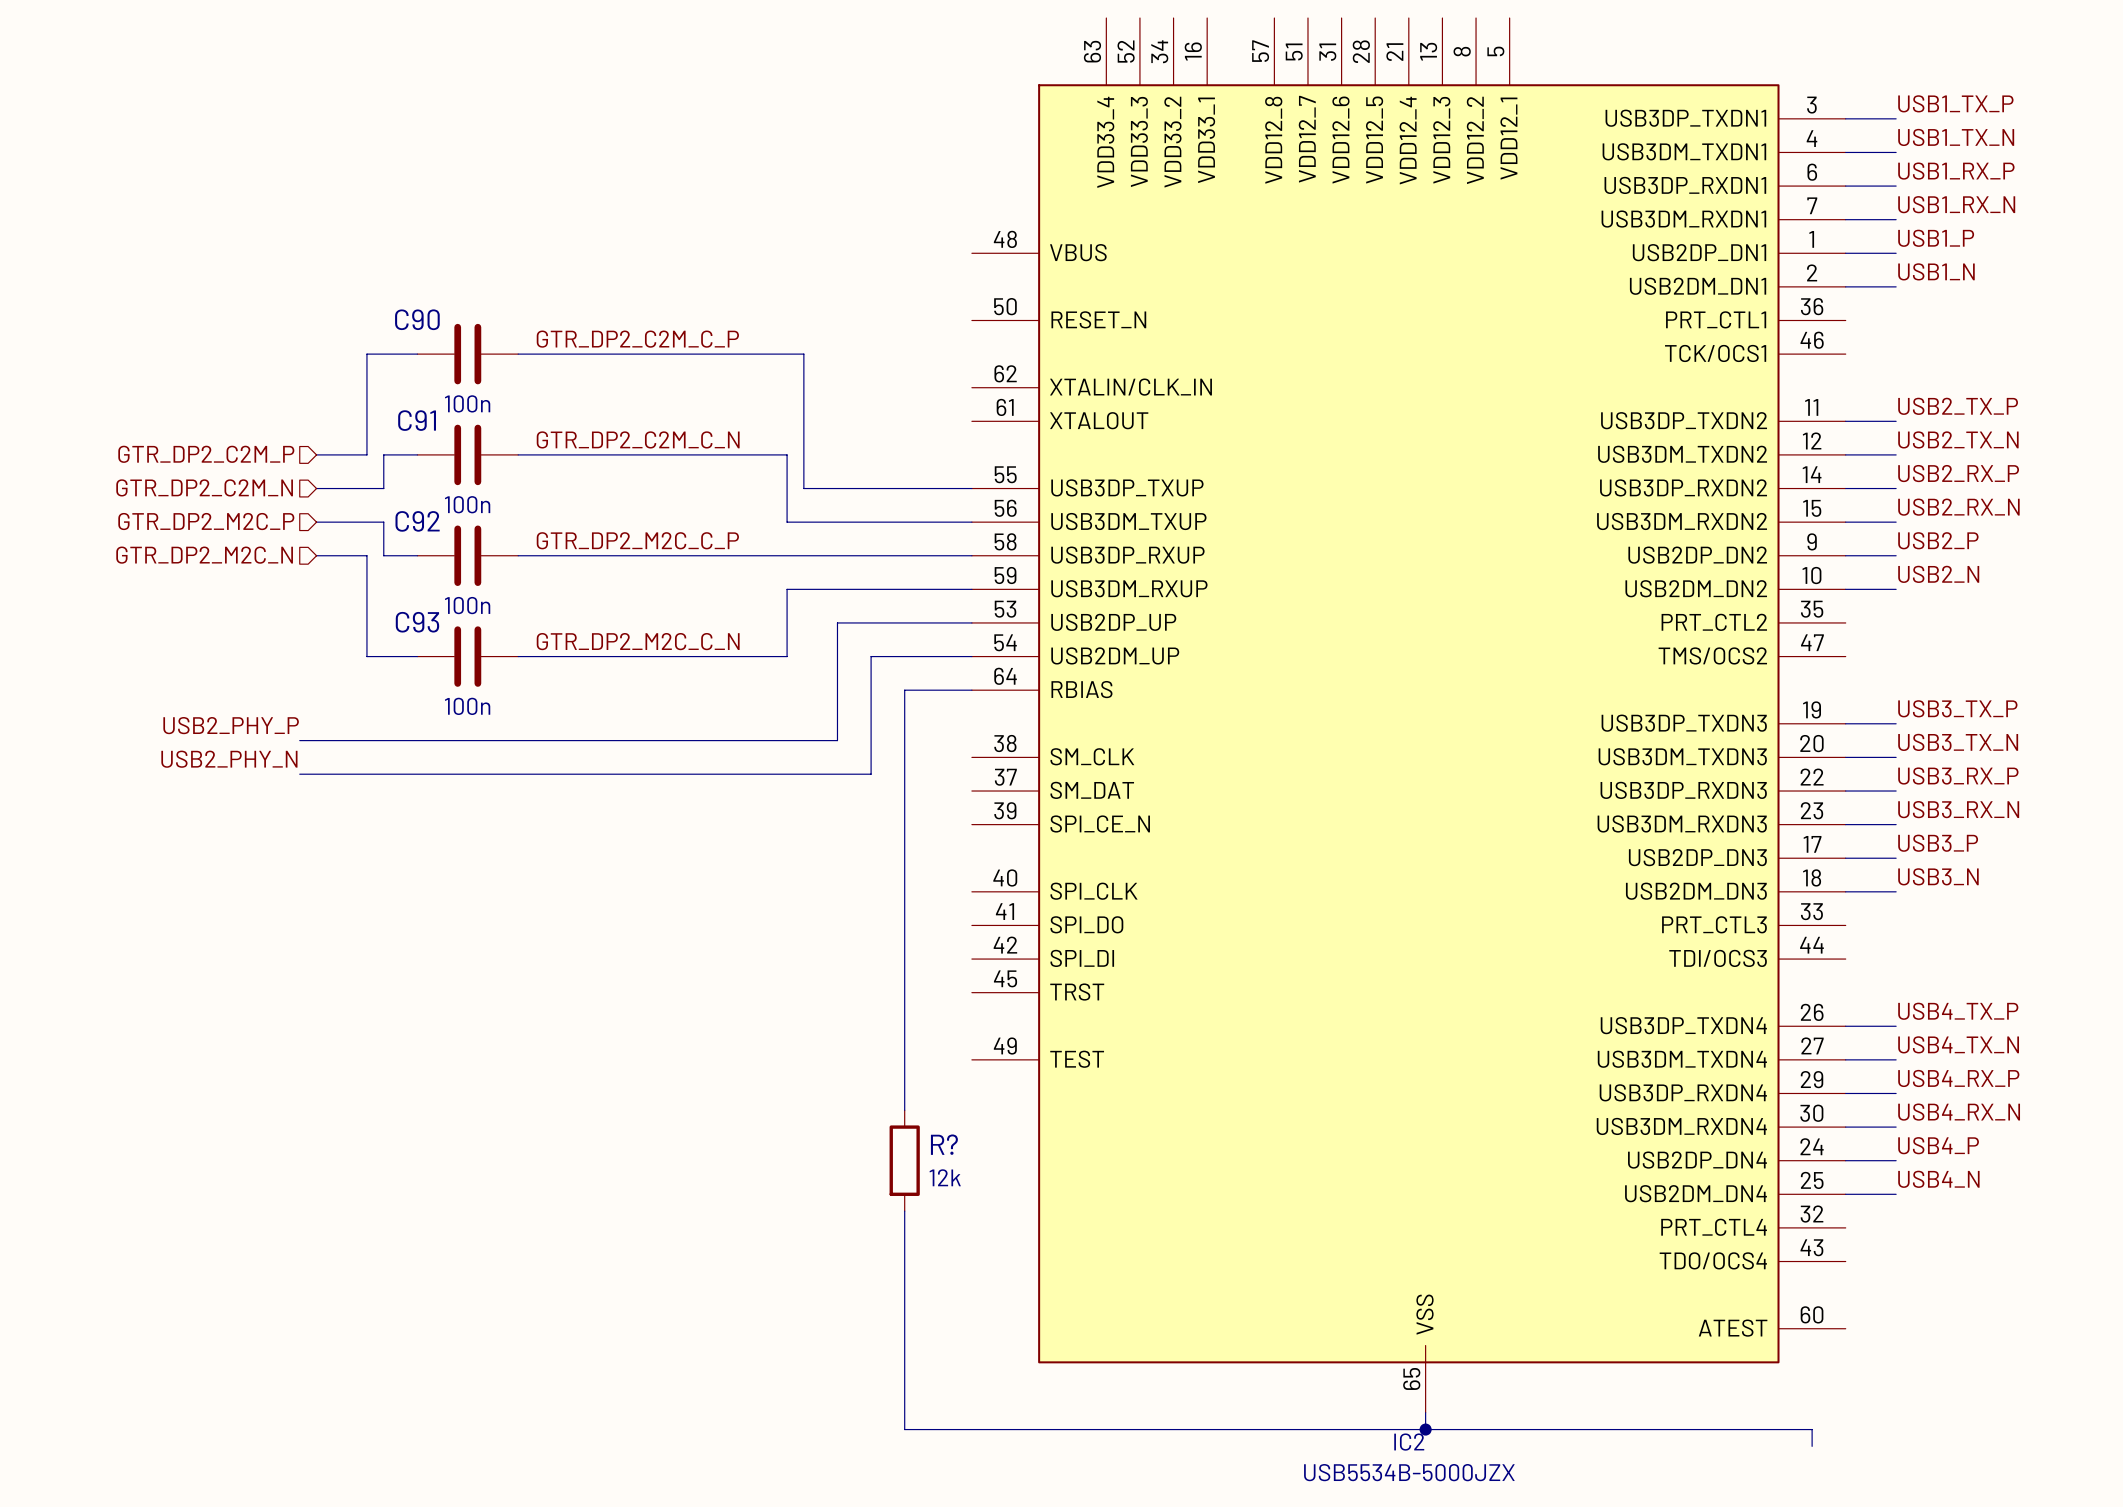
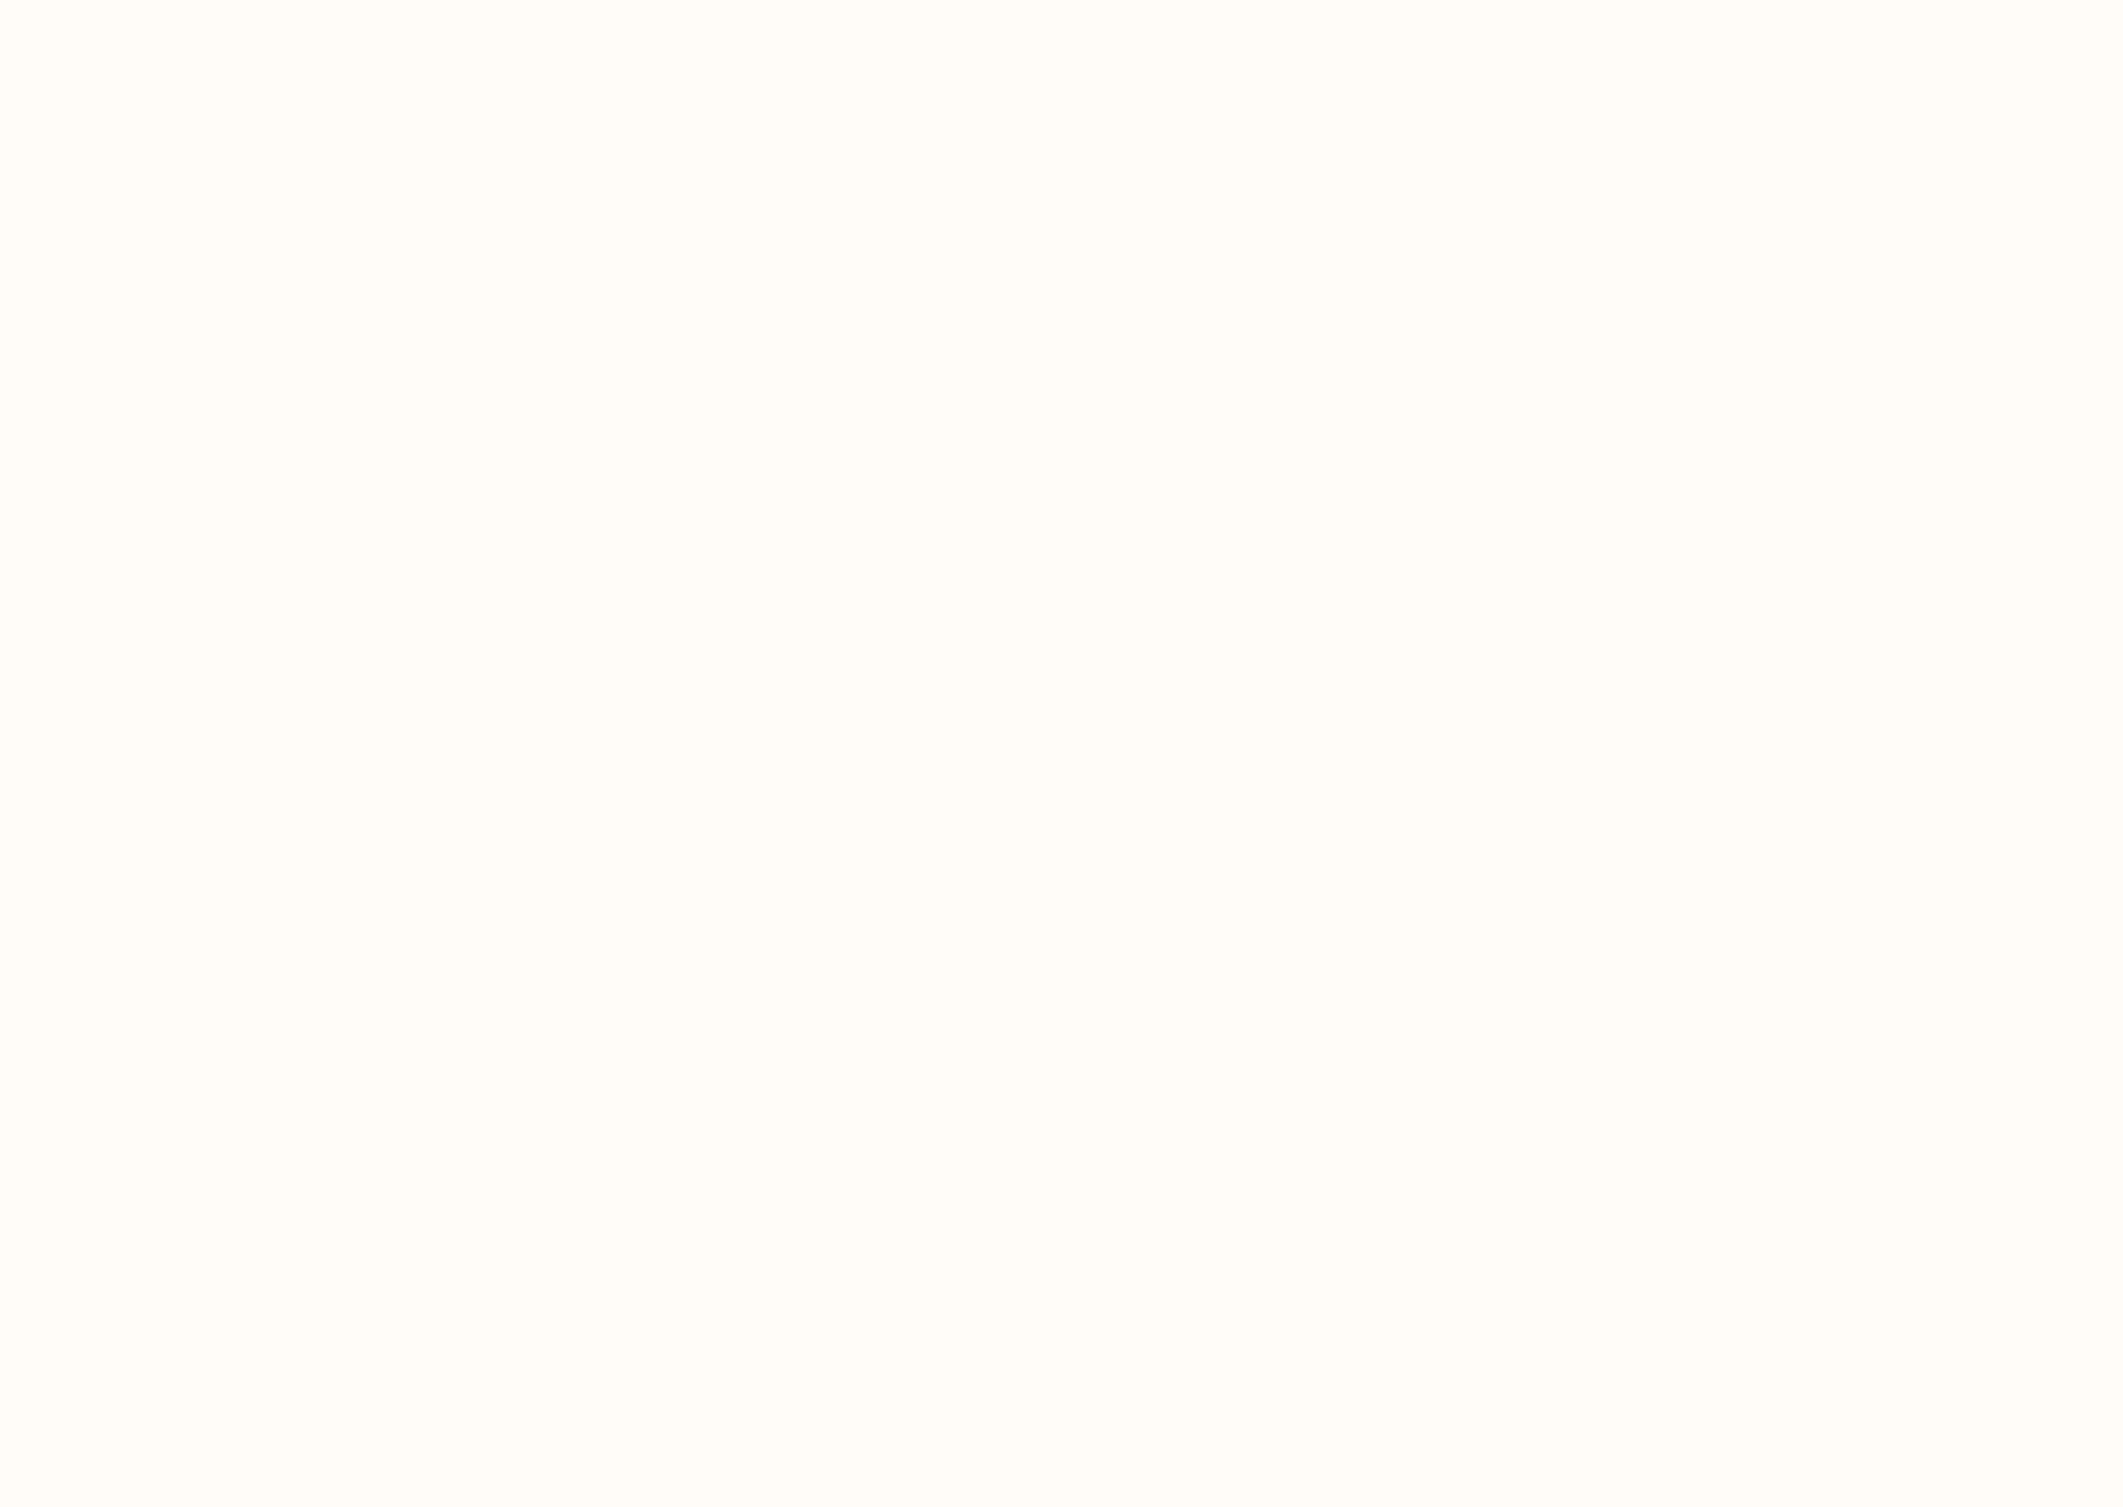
label: USB1_TX_P (1955, 103) -> none
wire: (1845, 118) (1896, 118) -> none
label: USB1_TX_N (1956, 137) -> none
wire: (1845, 152) (1896, 152) -> none
label: USB1_RX_P (1956, 171) -> none
wire: (1845, 186) (1896, 186) -> none
label: USB1_RX_N (1956, 204) -> none
wire: (1845, 219) (1896, 219) -> none
label: USB1_P (1936, 238) -> none
wire: (1845, 253) (1896, 253) -> none
label: USB1_N (1936, 271) -> none
wire: (1845, 286) (1896, 286) -> none
label: GTR_DP2_C2M_C_P (637, 339) -> none
wire: (417, 354) (366, 354) (366, 454) (316, 454) -> none
C90: (467, 354) -> none
wire: (518, 354) (803, 354) (803, 488) (971, 488) -> none
label: USB2_TX_P (1958, 406) -> none
wire: (1845, 421) (1896, 421) -> none
label: GTR_DP2_C2M_C_N (638, 439) -> none
label: USB2_TX_N (1958, 439) -> none
hierarchical label: GTR_DP2_C2M_P (206, 454) -> none
wire: (417, 454) (383, 454) (383, 488) (316, 488) -> none
C91: (467, 454) -> none
wire: (518, 454) (787, 454) (787, 522) (971, 522) -> none
wire: (1845, 454) (1896, 454) -> none
label: USB2_RX_P (1958, 473) -> none
hierarchical label: GTR_DP2_C2M_N (204, 487) -> none
wire: (1845, 488) (1896, 488) -> none
label: USB2_RX_N (1958, 507) -> none
hierarchical label: GTR_DP2_M2C_P (206, 521) -> none
wire: (316, 522) (383, 522) (383, 555) (417, 555) -> none
wire: (1845, 522) (1896, 522) -> none
label: GTR_DP2_M2C_C_P (637, 540) -> none
label: USB2_P (1938, 540) -> none
hierarchical label: GTR_DP2_M2C_N (204, 555) -> none
wire: (316, 555) (366, 555) (366, 656) (417, 656) -> none
C92: (467, 555) -> none
wire: (518, 555) (971, 555) -> none
wire: (1845, 555) (1896, 555) -> none
label: USB2_N (1938, 574) -> none
wire: (971, 589) (787, 589) (787, 656) (518, 656) -> none
wire: (1845, 589) (1896, 589) -> none
wire: (971, 622) (837, 622) (837, 740) (299, 740) -> none
label: GTR_DP2_M2C_C_N (638, 641) -> none
C93: (467, 656) -> none
wire: (971, 656) (871, 656) (871, 774) (299, 774) -> none
wire: (971, 690) (904, 690) (904, 1110) -> none
label: USB3_TX_P (1957, 708) -> none
IC2: USB5534B-5000JZX (1408, 715) -> none
wire: (1845, 723) (1896, 723) -> none
label: USB2_PHY_P (231, 725) -> none
label: USB3_TX_N (1958, 742) -> none
wire: (1845, 757) (1896, 757) -> none
label: USB2_PHY_N (229, 759) -> none
label: USB3_RX_P (1958, 776) -> none
wire: (1845, 791) (1896, 791) -> none
label: USB3_RX_N (1958, 809) -> none
wire: (1845, 824) (1896, 824) -> none
label: USB3_P (1938, 843) -> none
wire: (1845, 858) (1896, 858) -> none
label: USB3_N (1938, 876) -> none
wire: (1845, 891) (1896, 891) -> none
label: USB4_TX_P (1958, 1011) -> none
wire: (1845, 1026) (1896, 1026) -> none
label: USB4_TX_N (1958, 1044) -> none
wire: (1845, 1059) (1896, 1059) -> none
label: USB4_RX_P (1958, 1078) -> none
wire: (1845, 1093) (1896, 1093) -> none
label: USB4_RX_N (1959, 1112) -> none
wire: (1845, 1127) (1896, 1127) -> none
label: USB4_P (1938, 1145) -> none
R?: (904, 1160) -> none
wire: (1845, 1160) (1896, 1160) -> none
label: USB4_N (1938, 1179) -> none
wire: (1845, 1194) (1896, 1194) -> none
wire: (904, 1211) (904, 1429) (1812, 1429) (1812, 1446) -> none
wire: (1425, 1412) (1425, 1429) -> none
junction: (1425, 1429) -> none

